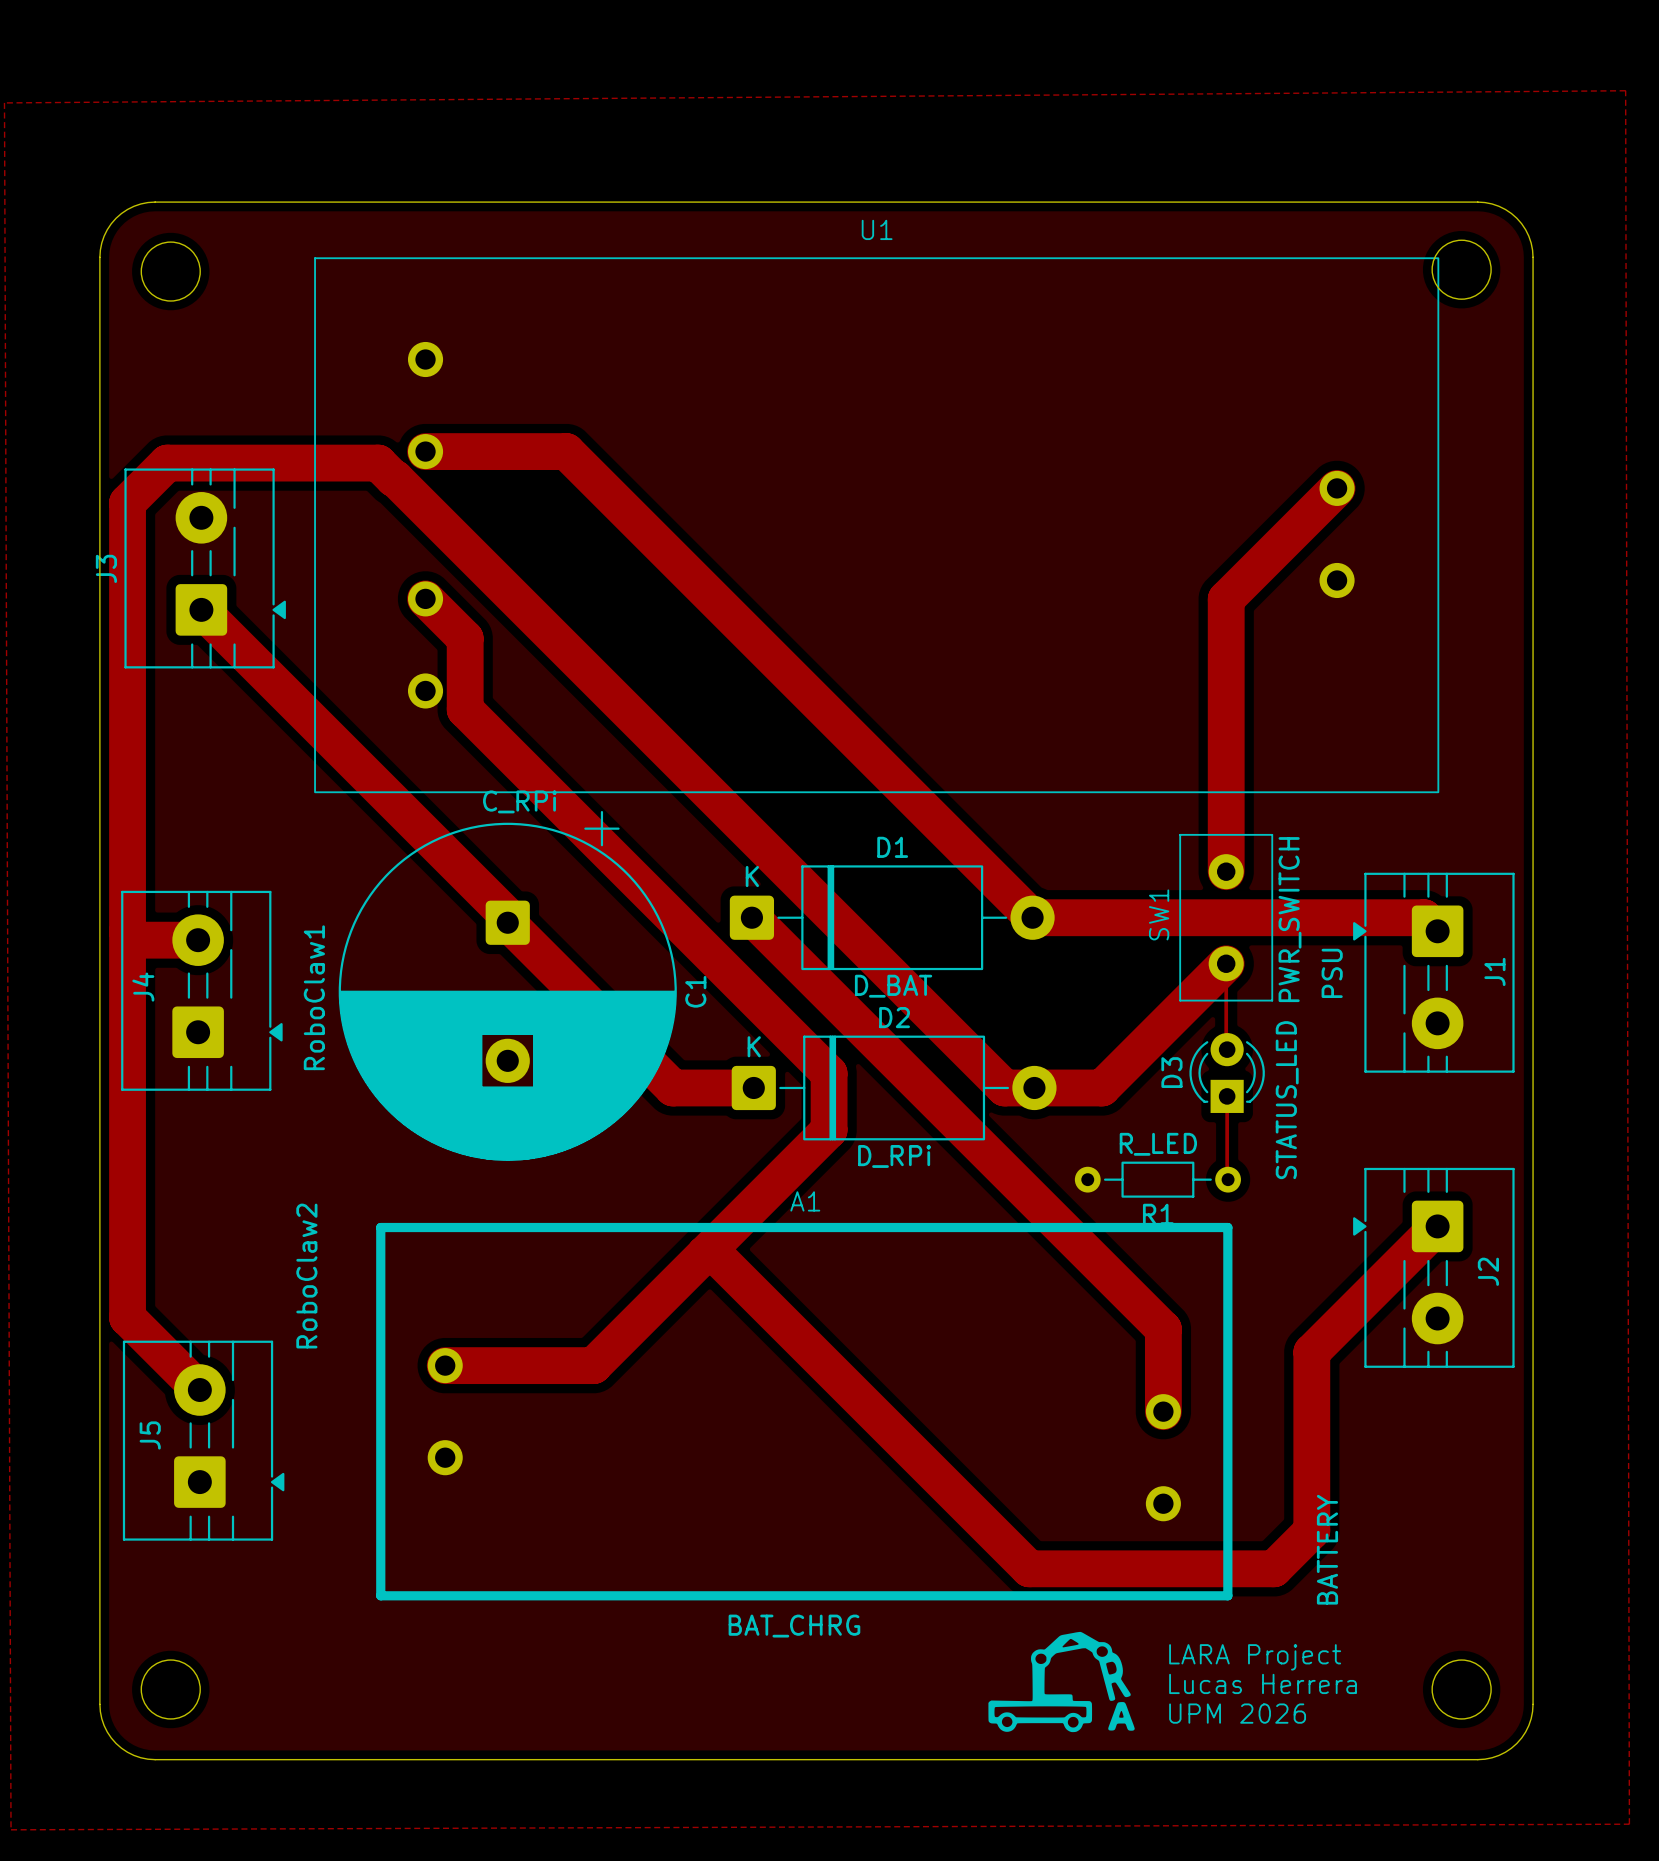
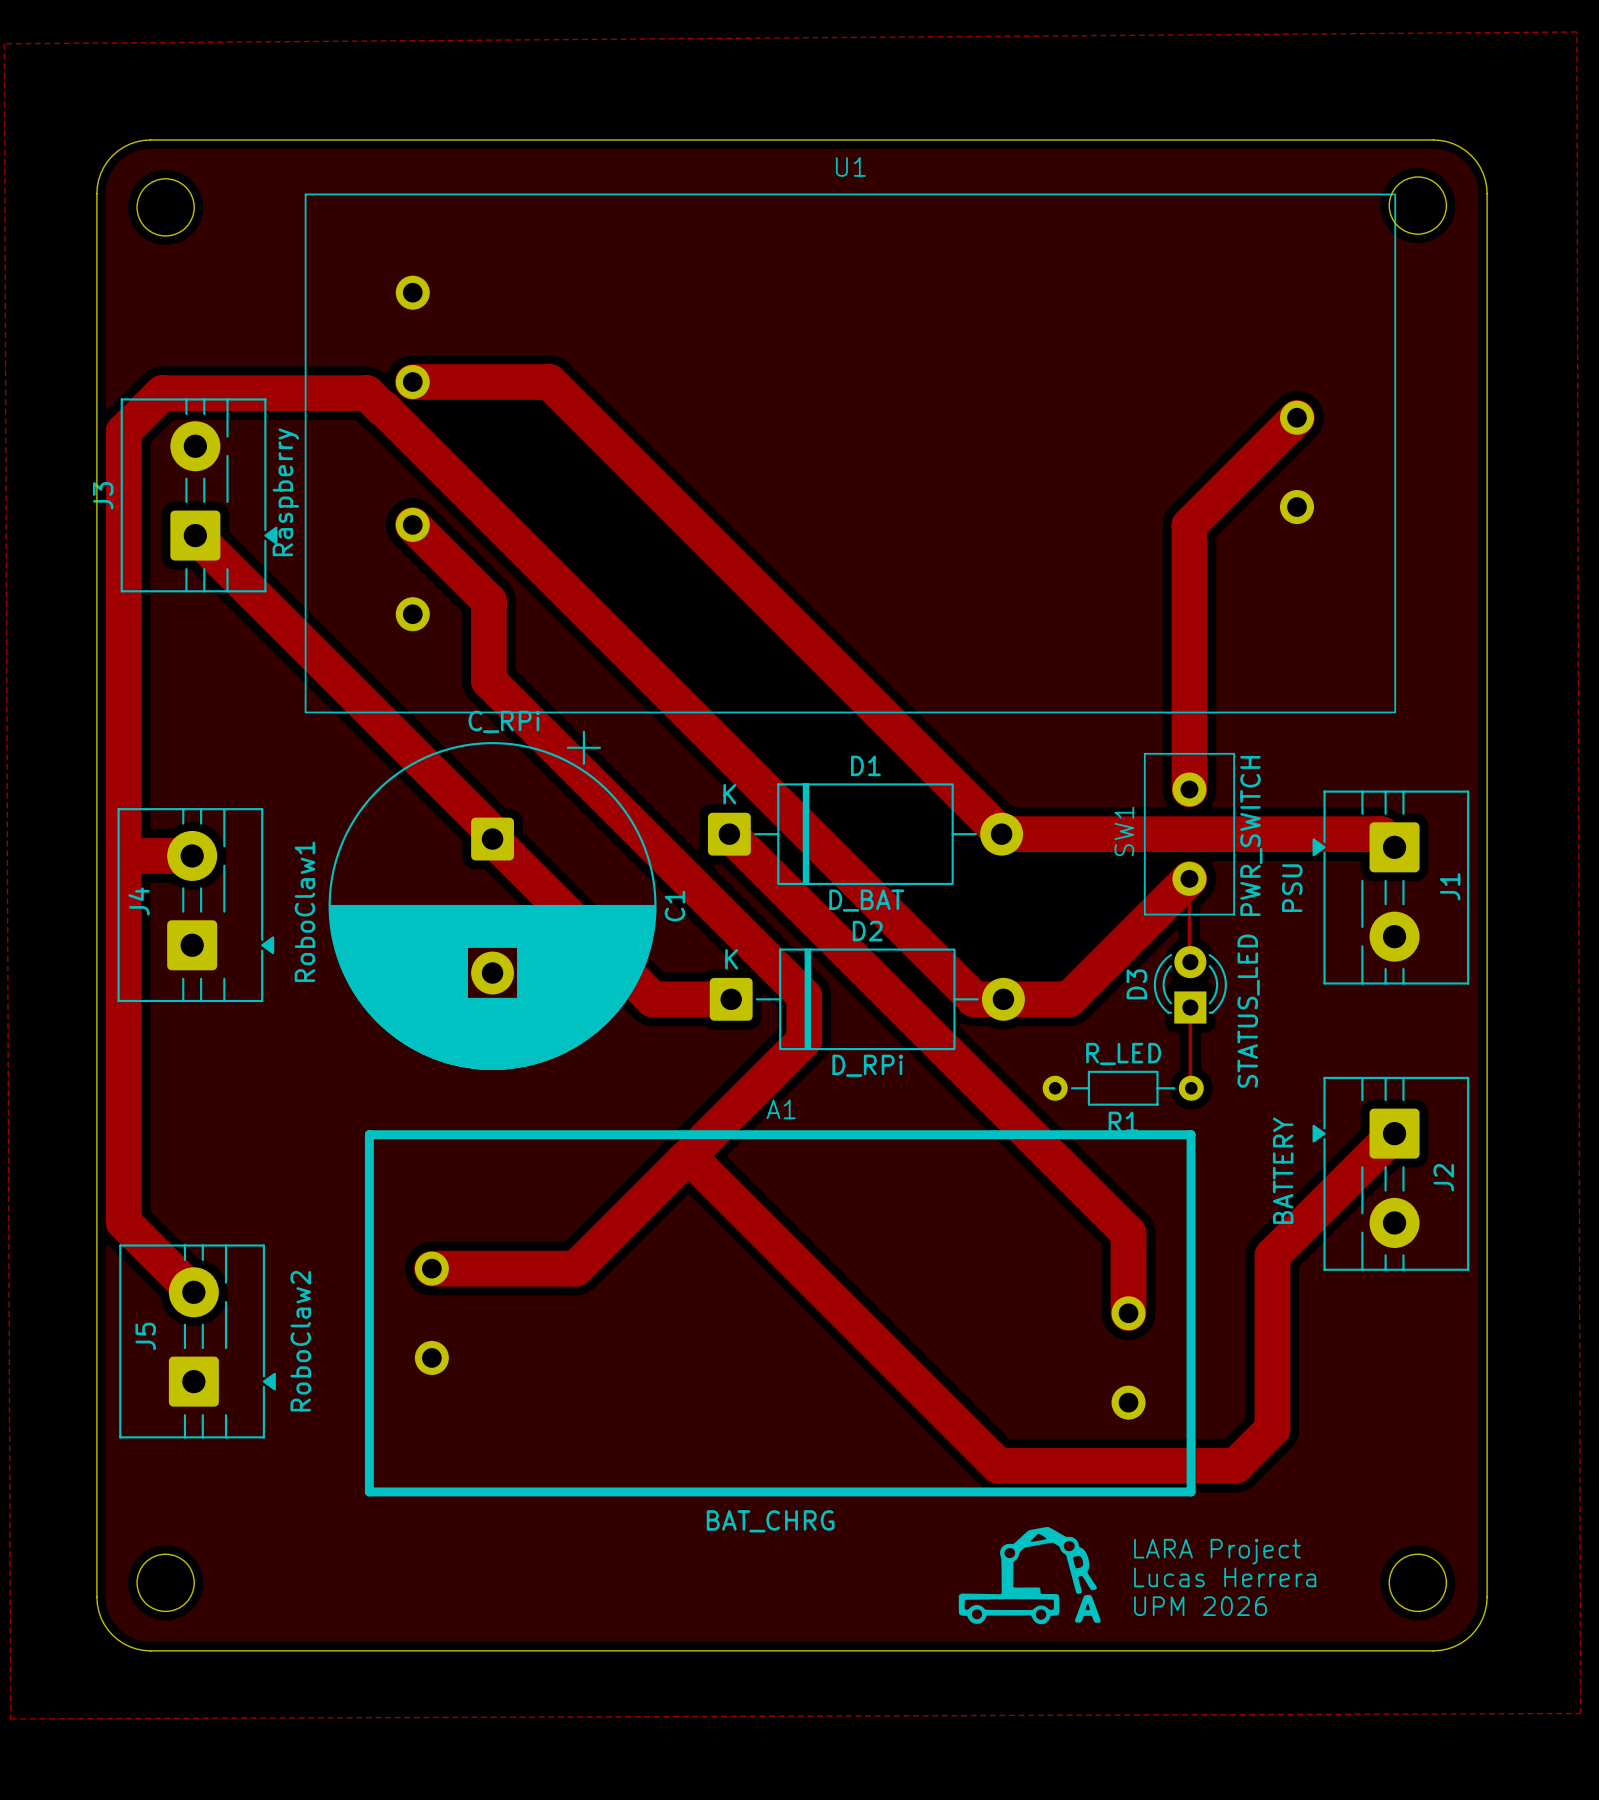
text: none -> Raspberry (285, 492)
track: (465, 638) (465, 709) (829, 1073) (829, 1084) -> (451, 563) (488, 601) (488, 680) (804, 996)
text position: RoboClaw2 (306, 1276) -> RoboClaw2 (300, 1341)
text position: BATTERY (1327, 1549) -> BATTERY (1283, 1170)

